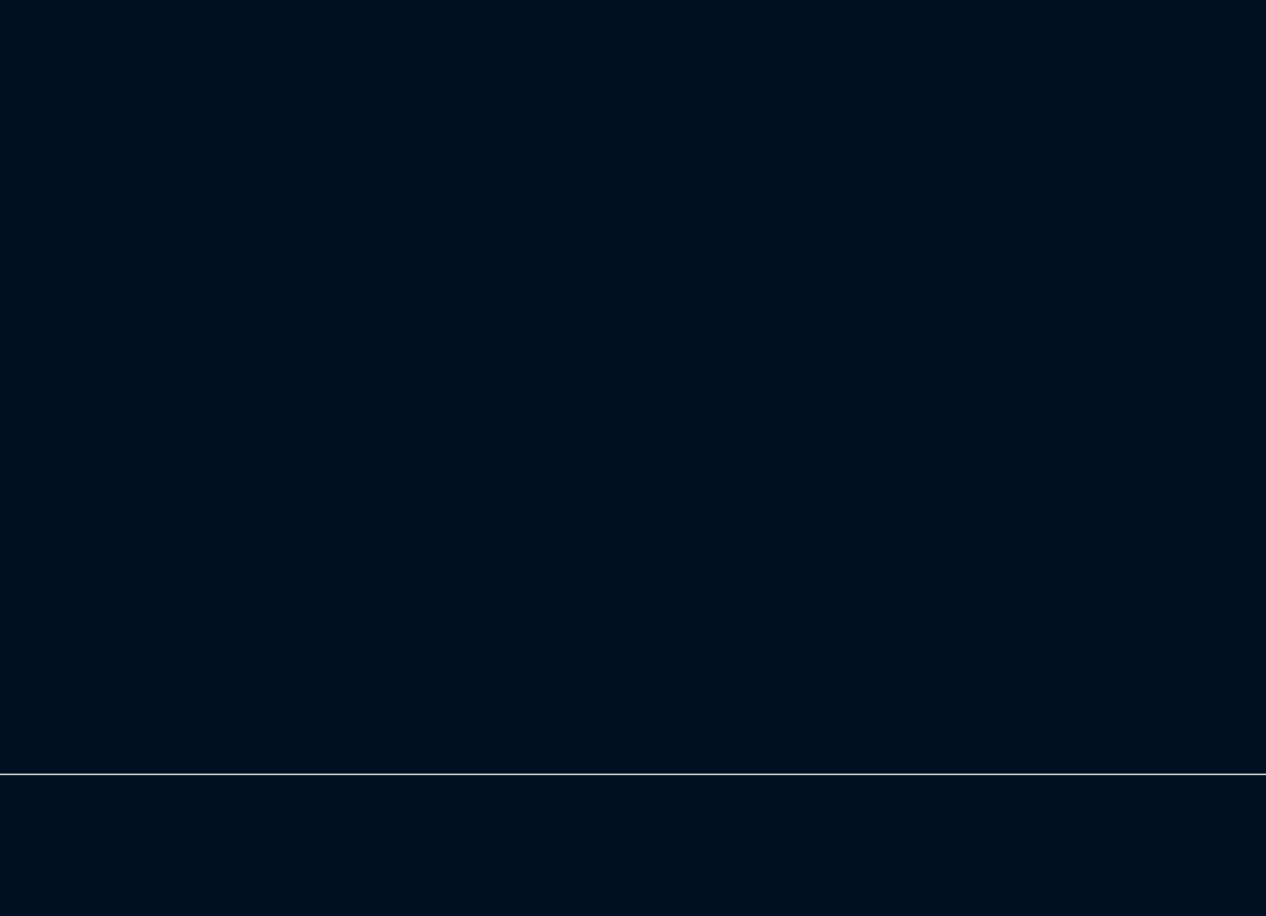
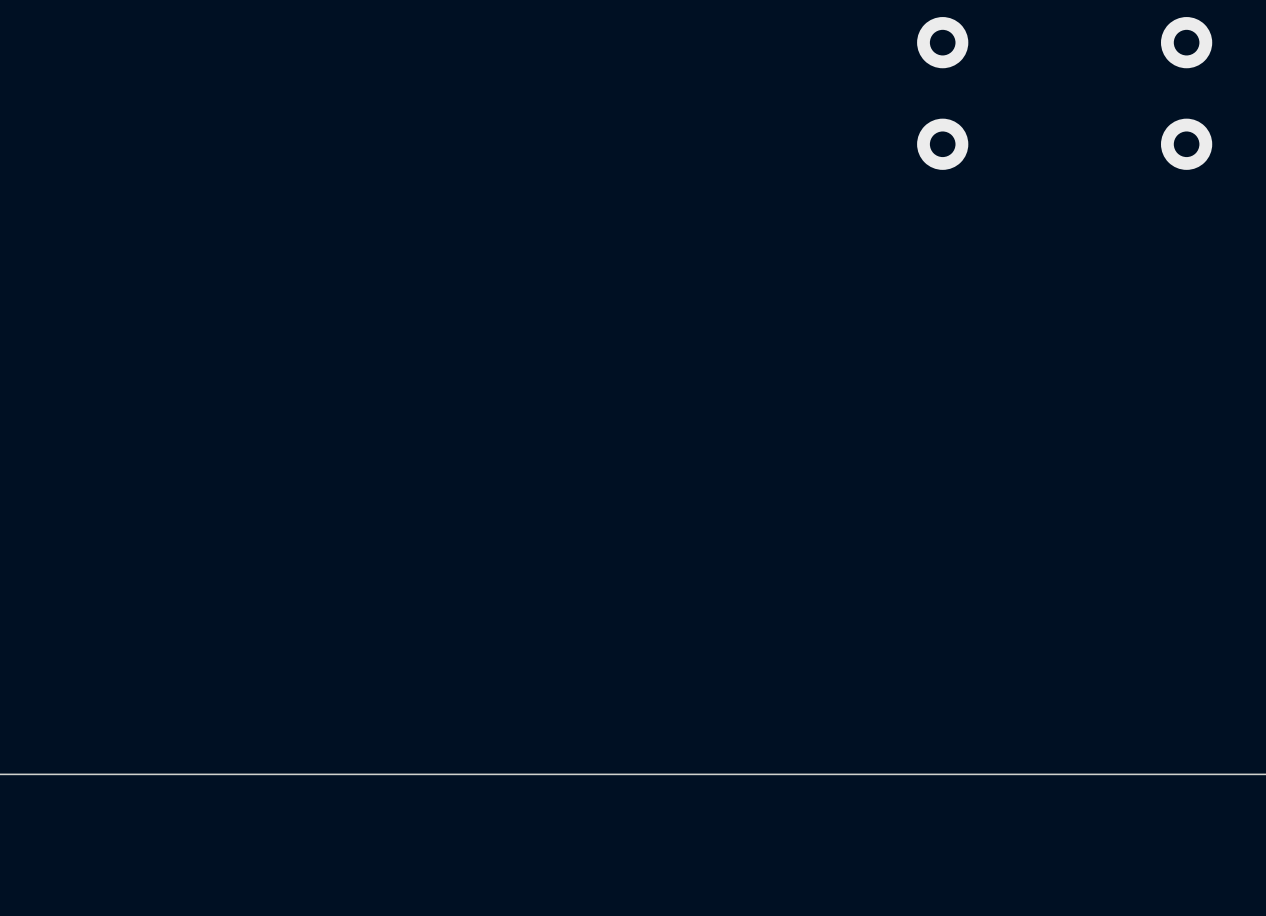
via: none -> (942, 42)
via: none -> (1186, 42)
via: none -> (942, 144)
via: none -> (1186, 144)

